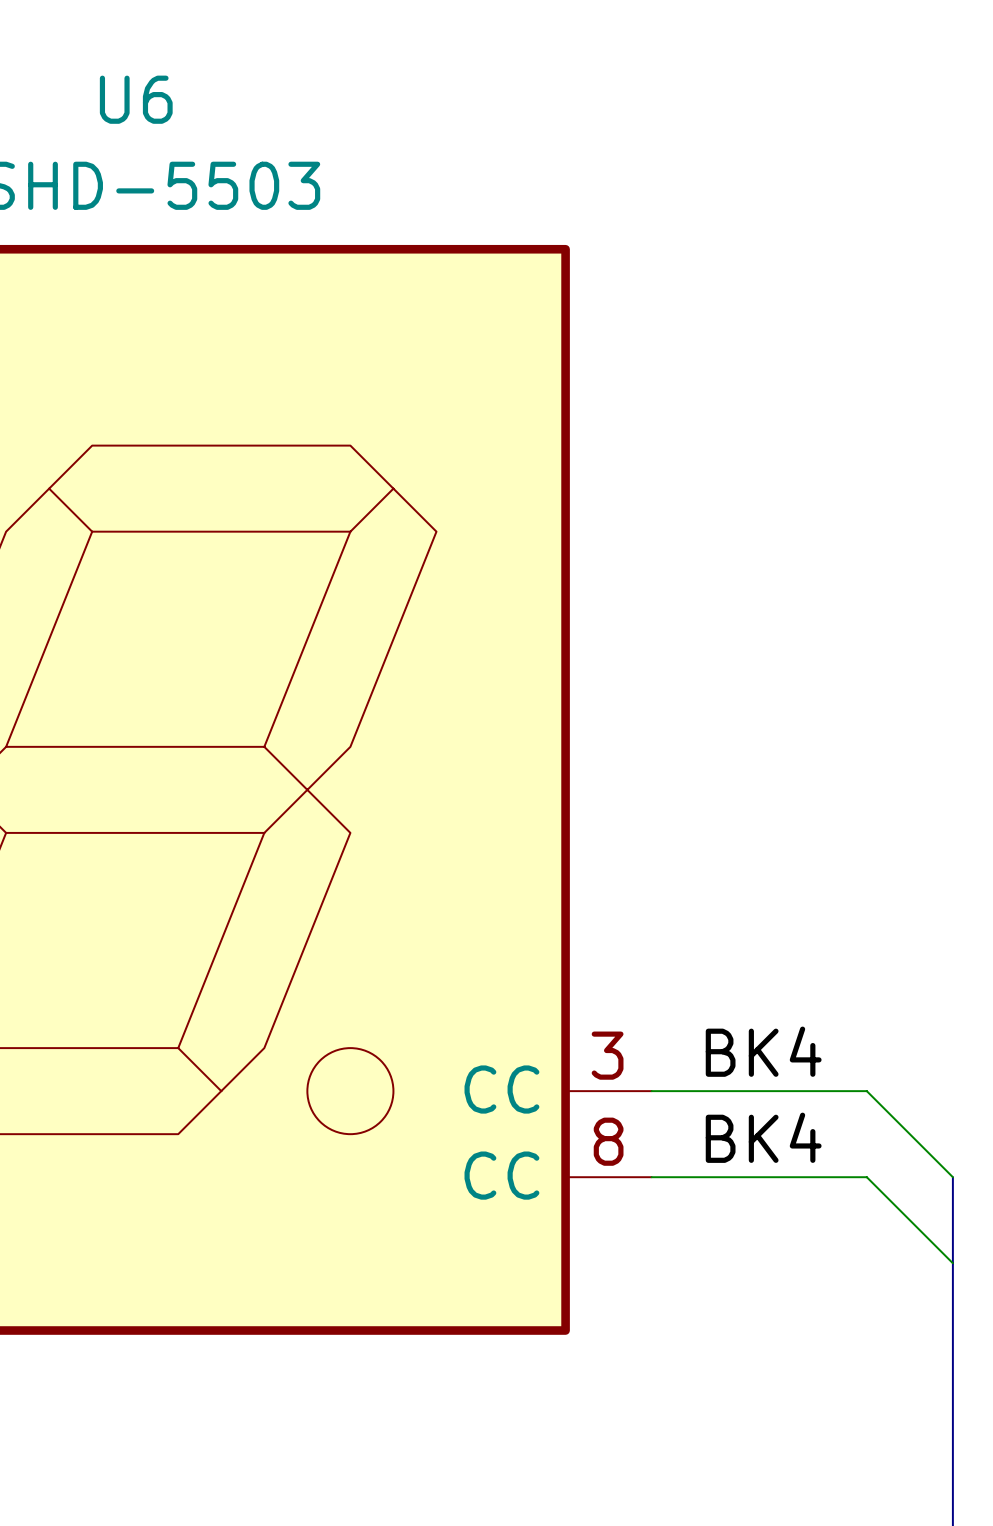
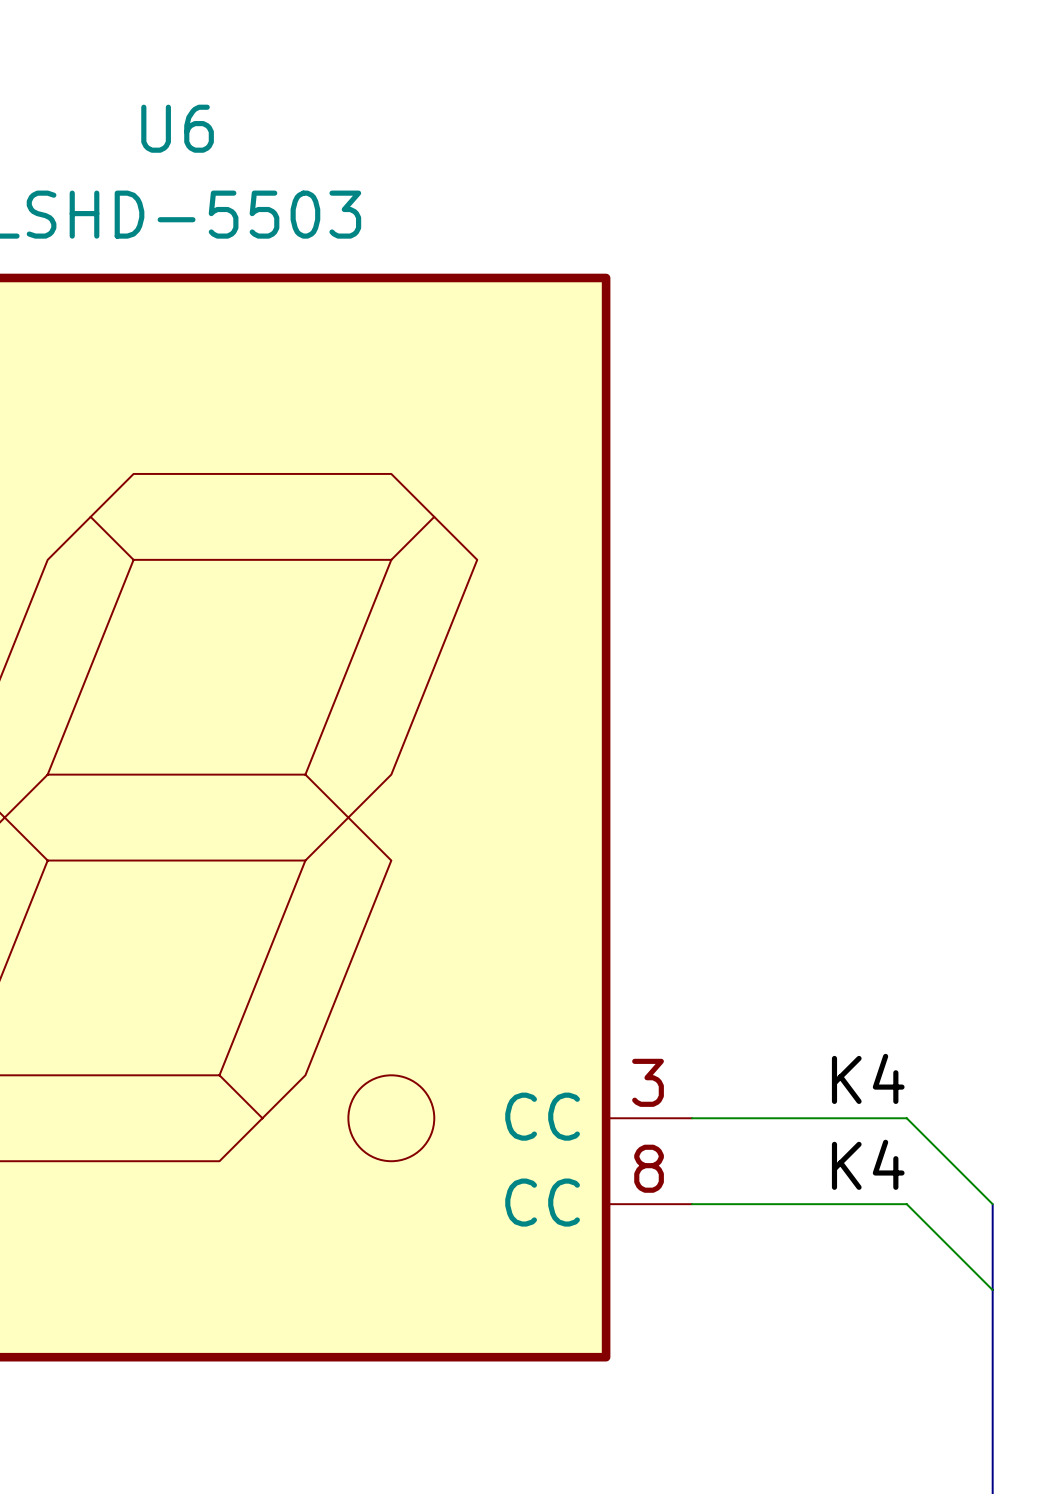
label: BK4 (763, 1051) -> none
label: none -> K4 (868, 1078)
label: BK4 (763, 1137) -> none
label: none -> K4 (868, 1164)

